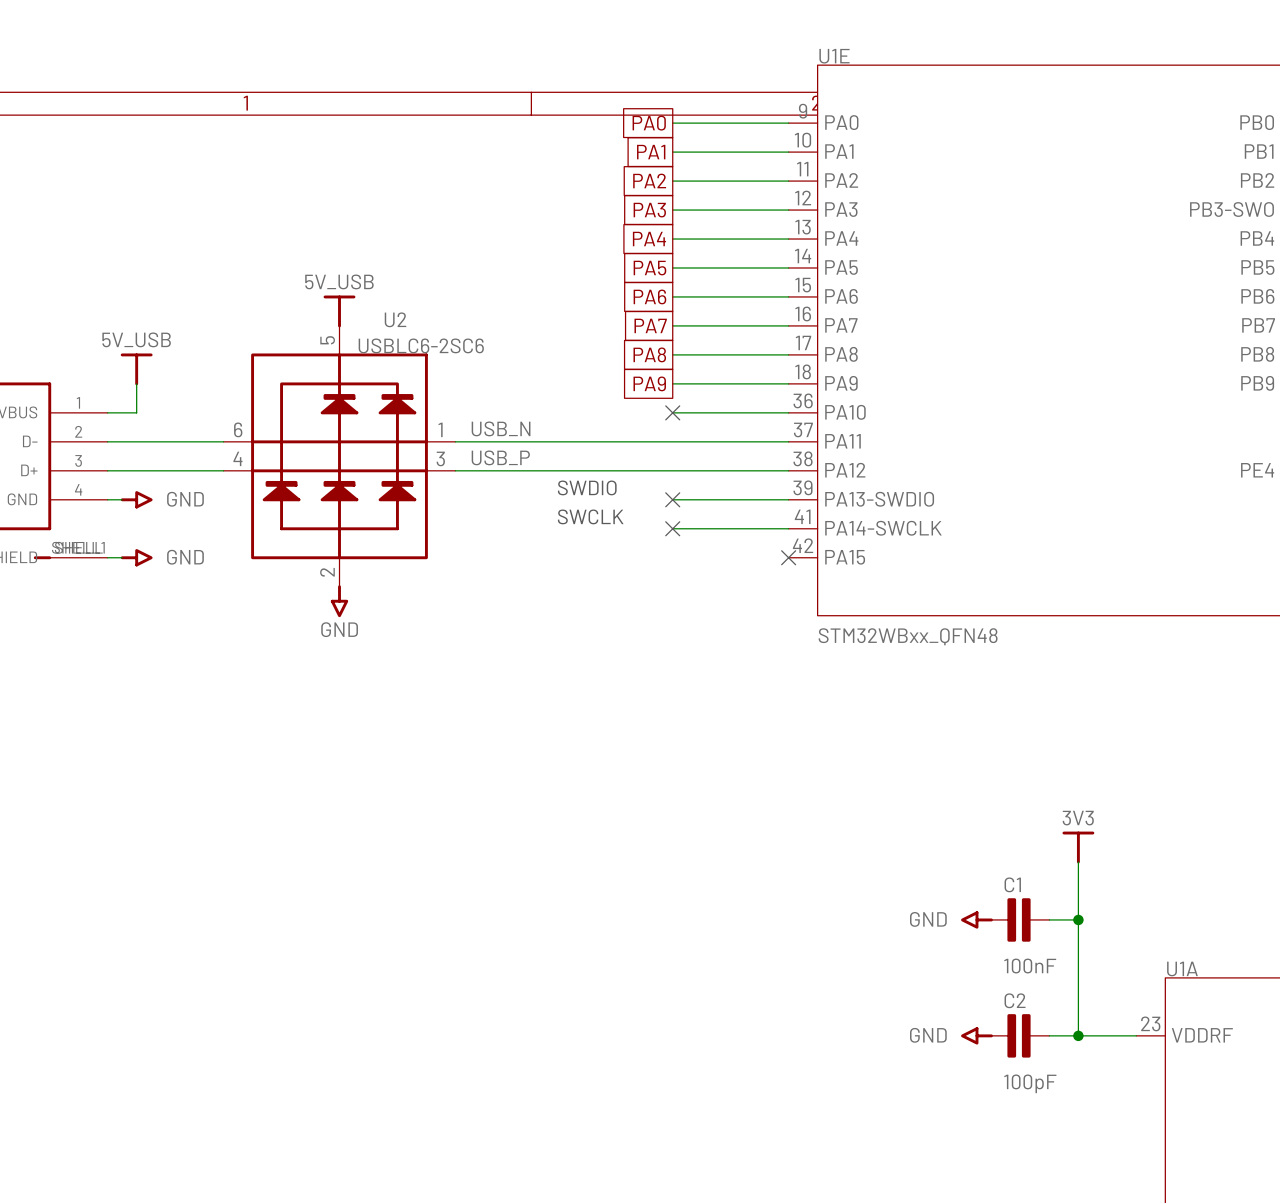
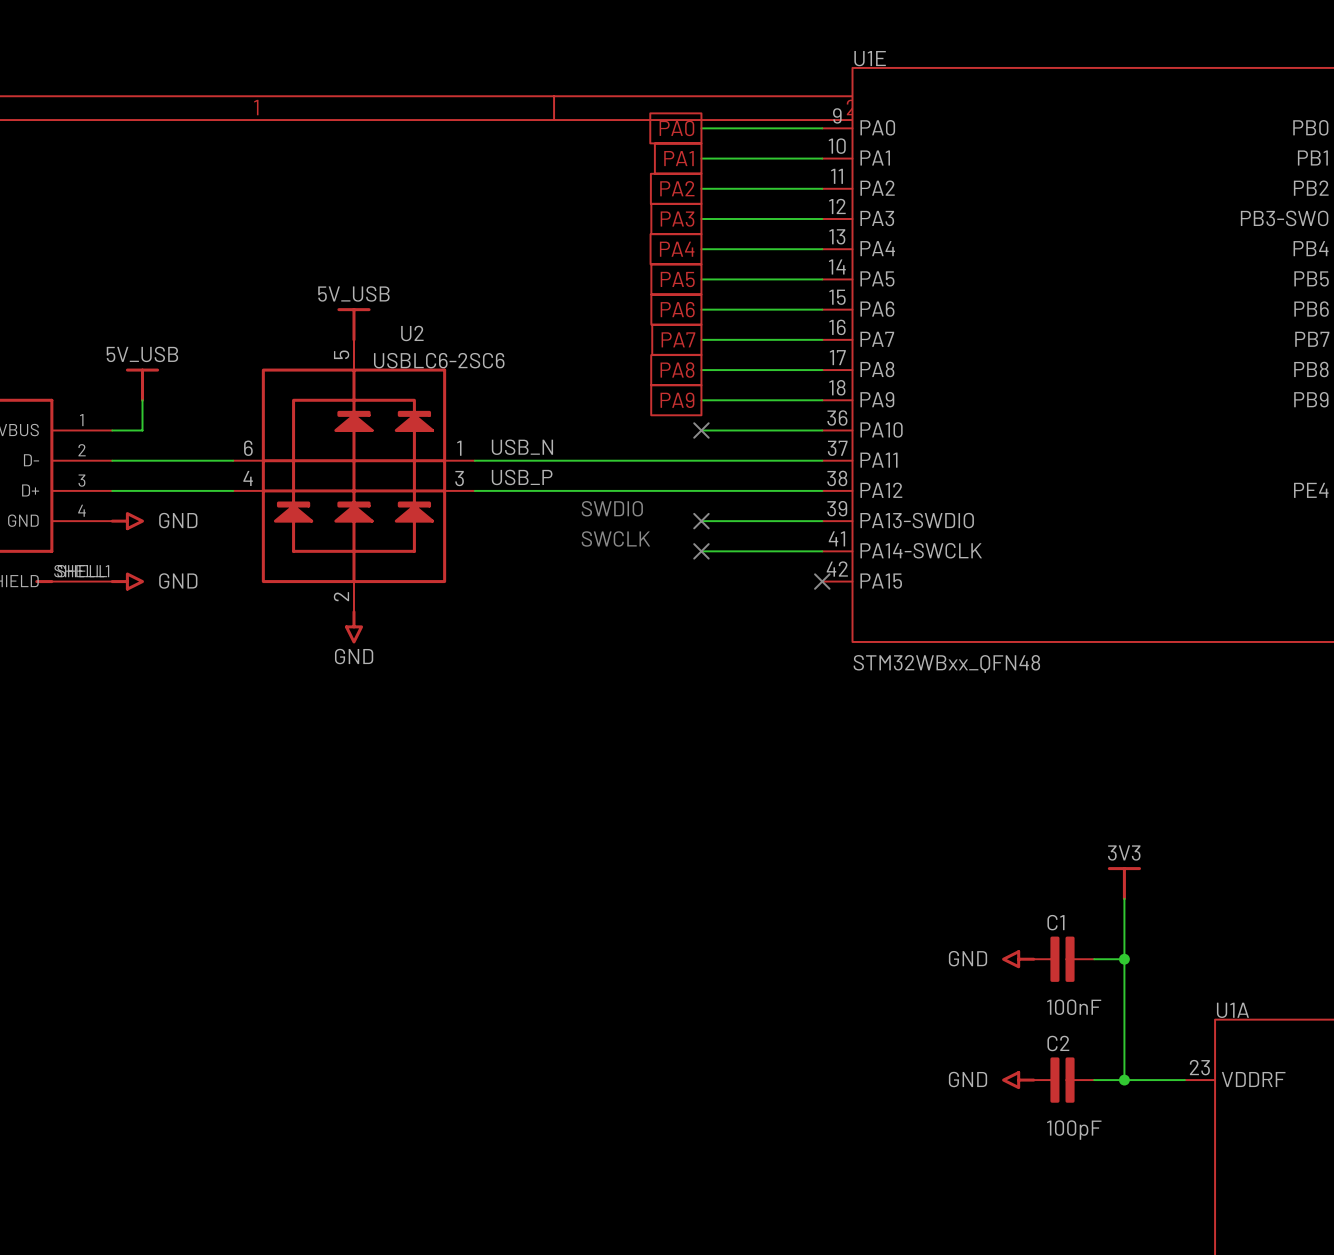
power symbol position: GND (136, 499) -> GND (127, 521)
power symbol position: GND (136, 557) -> GND (127, 581)

